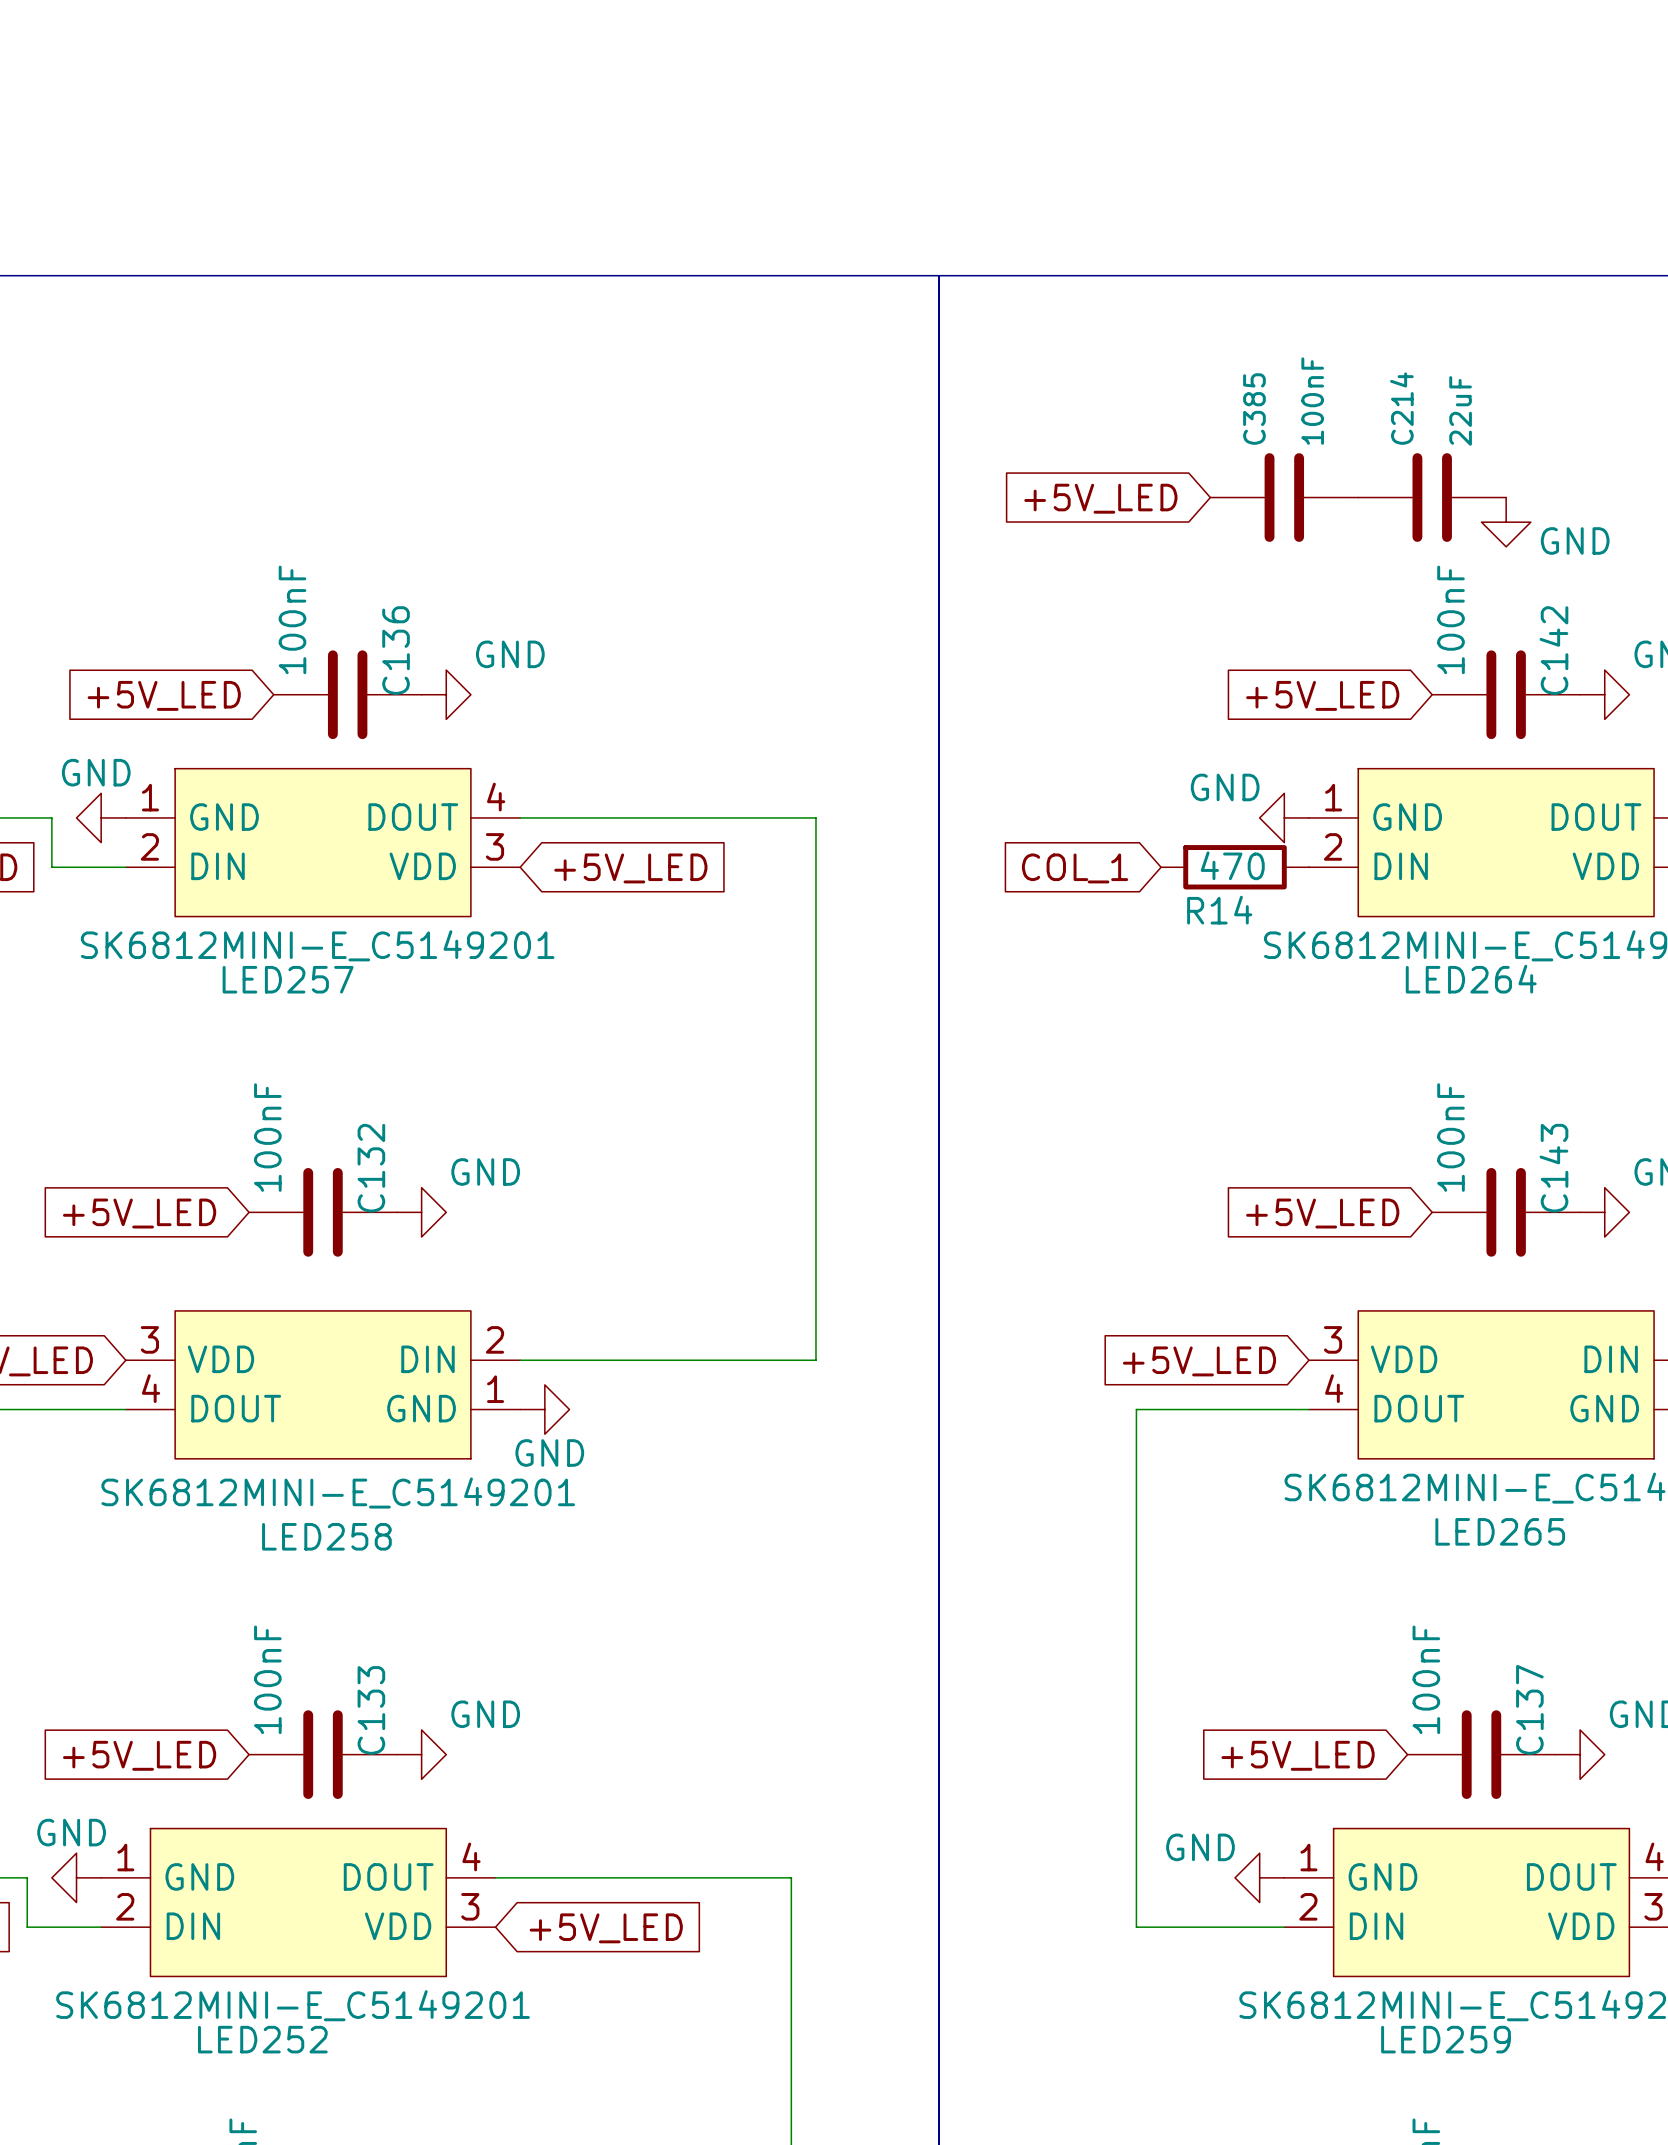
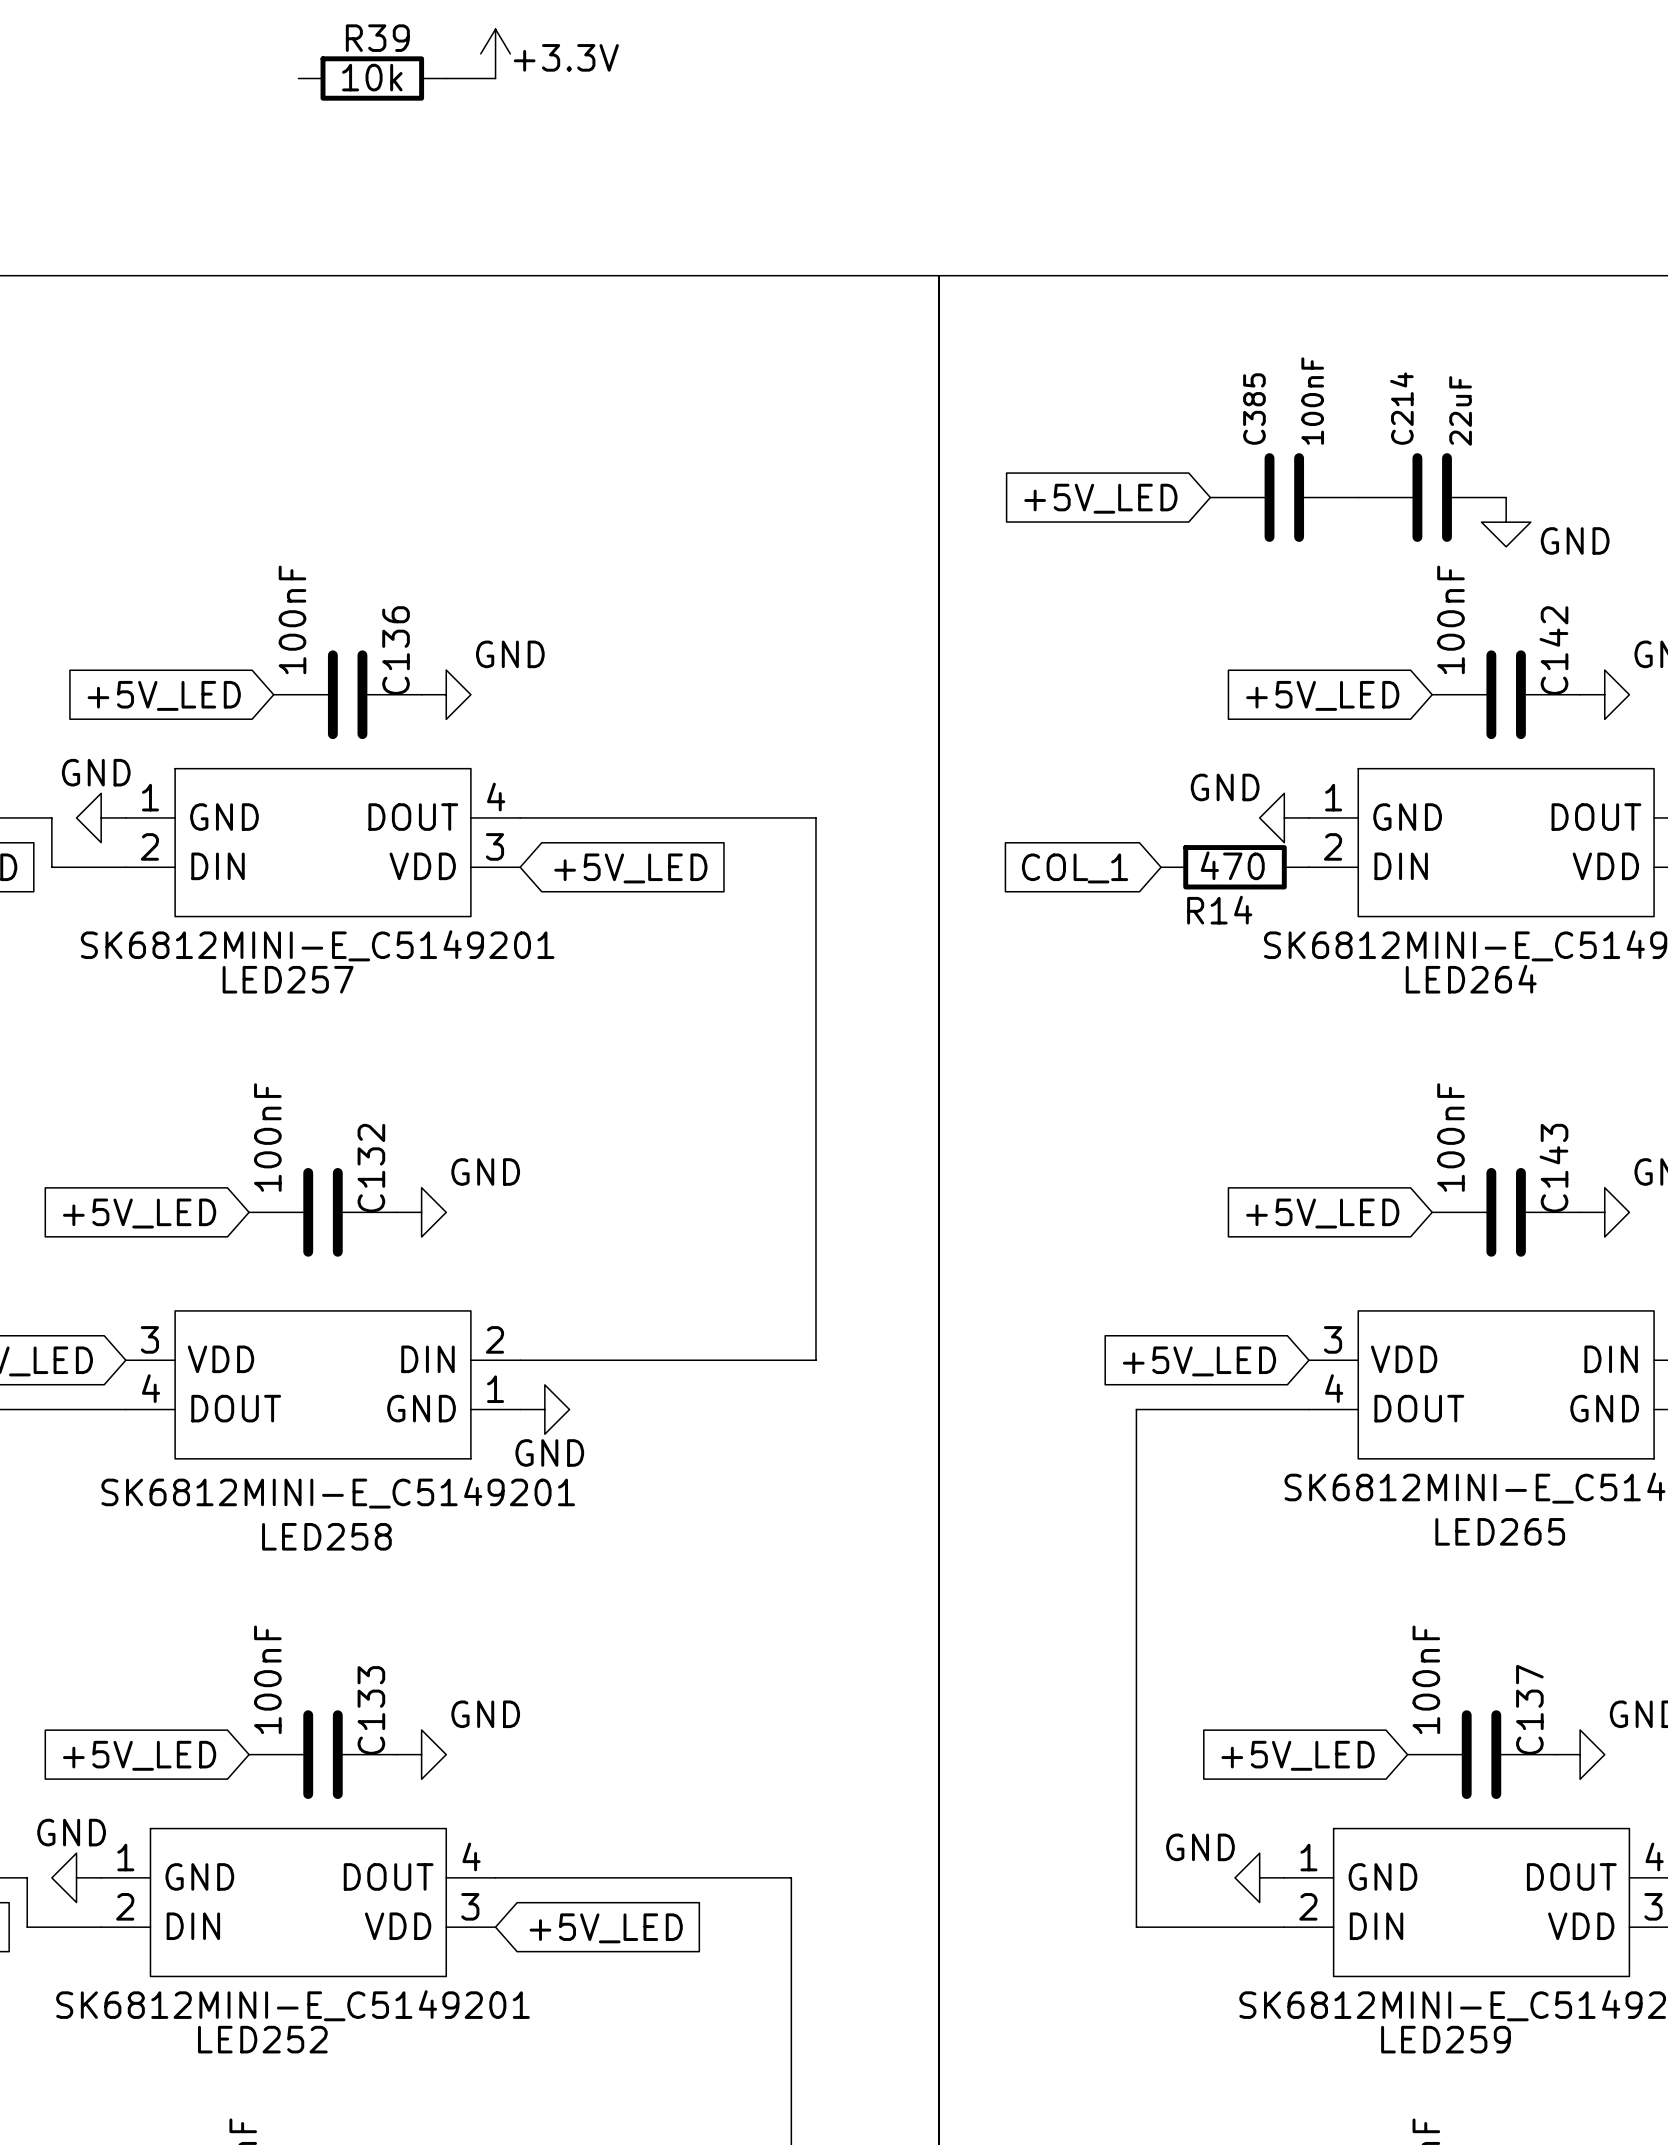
power symbol: none -> +3.3V (495, 53)
R39: none -> 10k (372, 78)
wire: none -> (446, 78) (495, 78)

